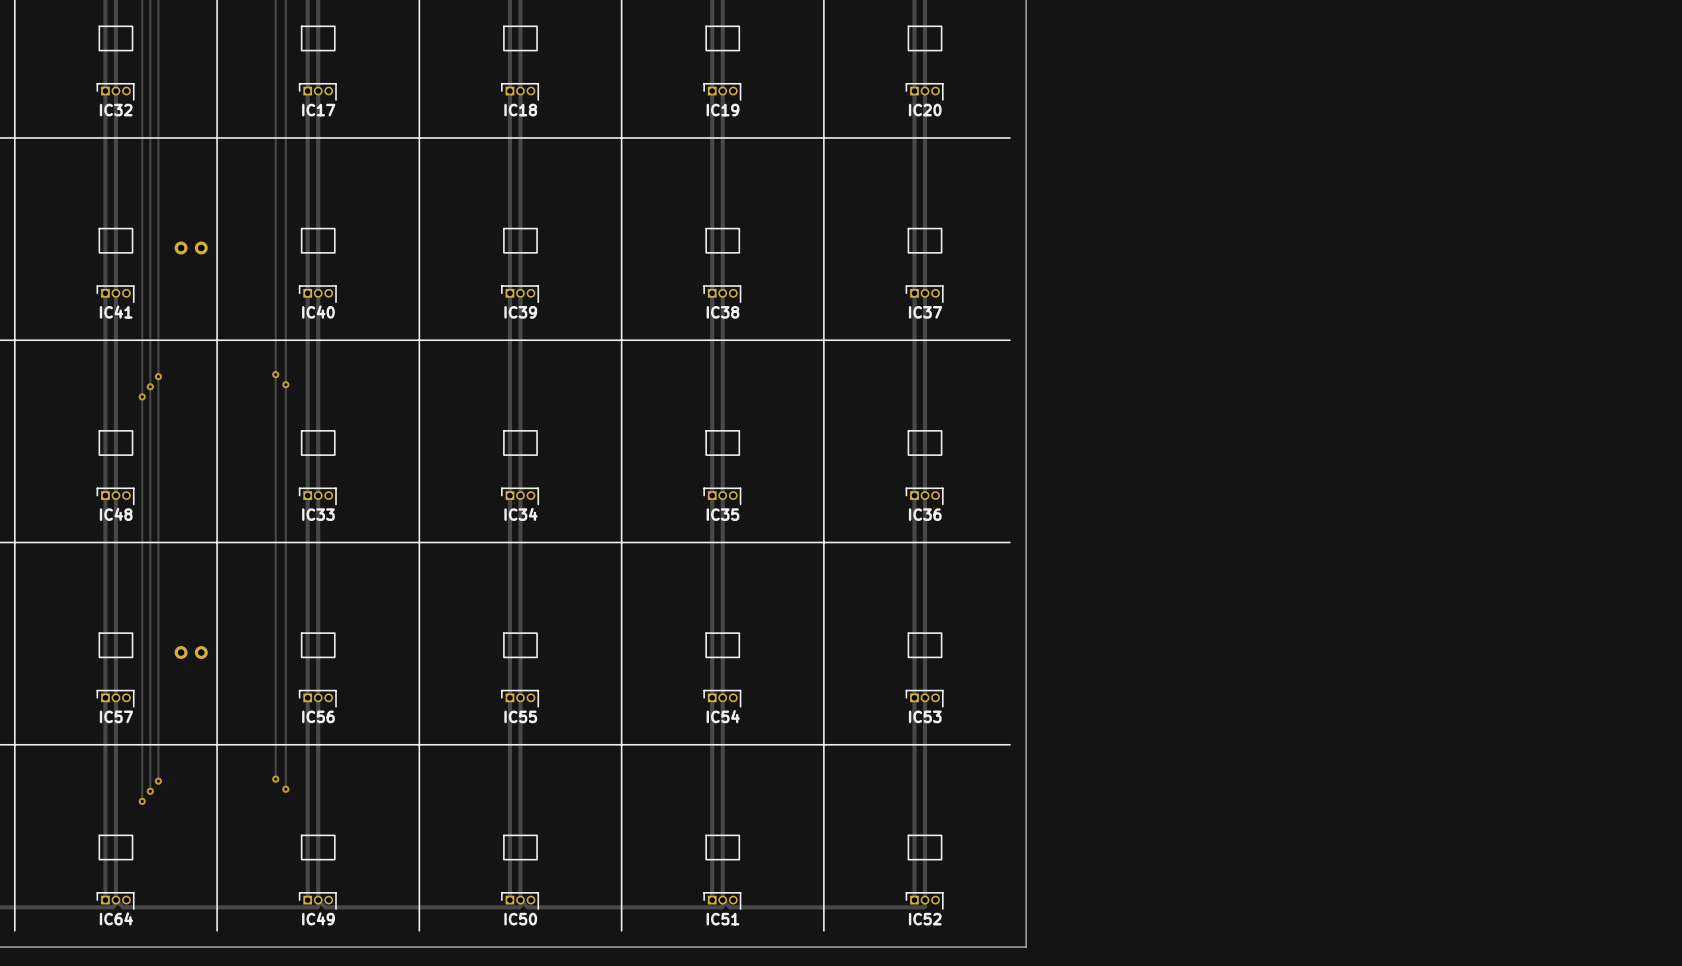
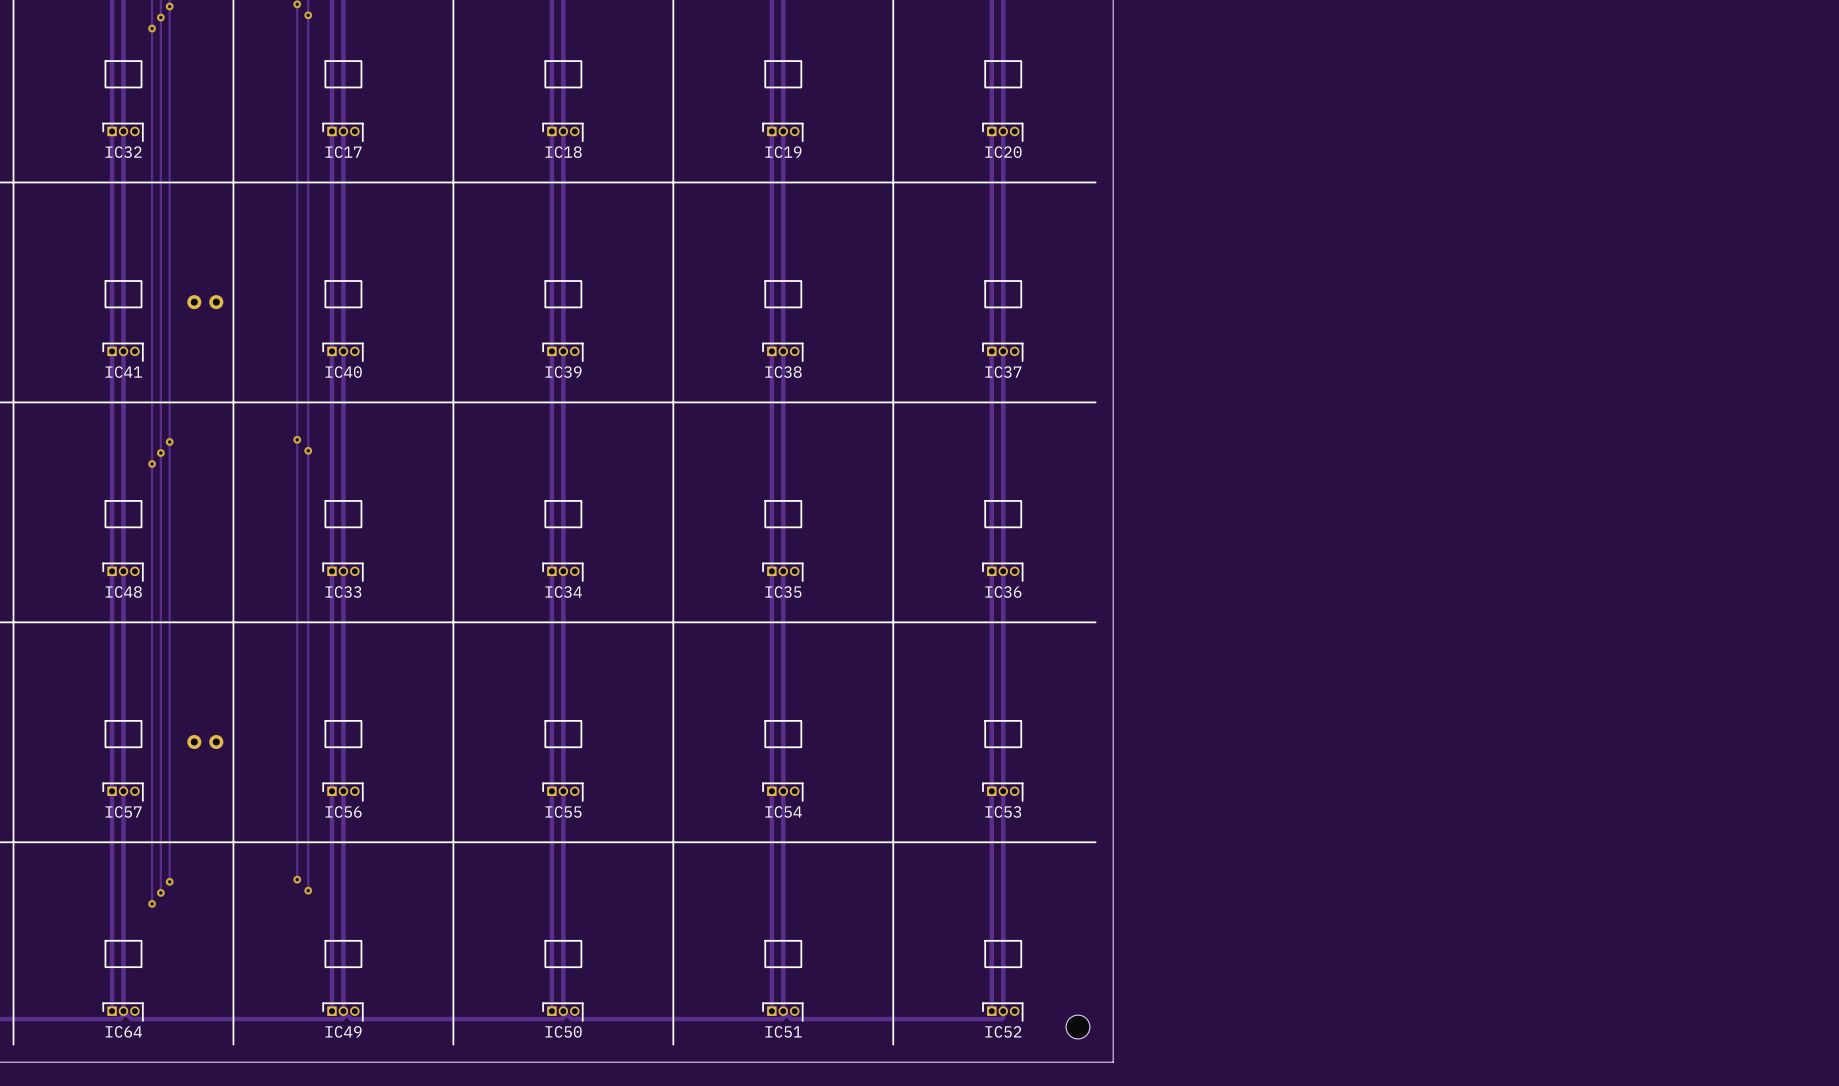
part: none -> (1078, 1027)

